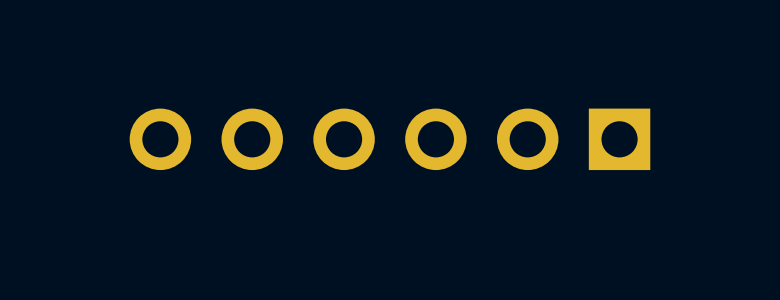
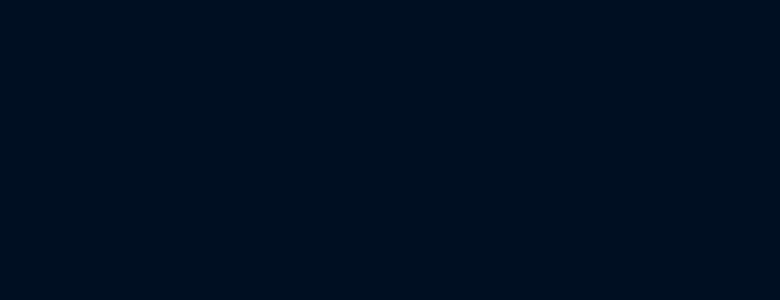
part: (389, 139) -> none

